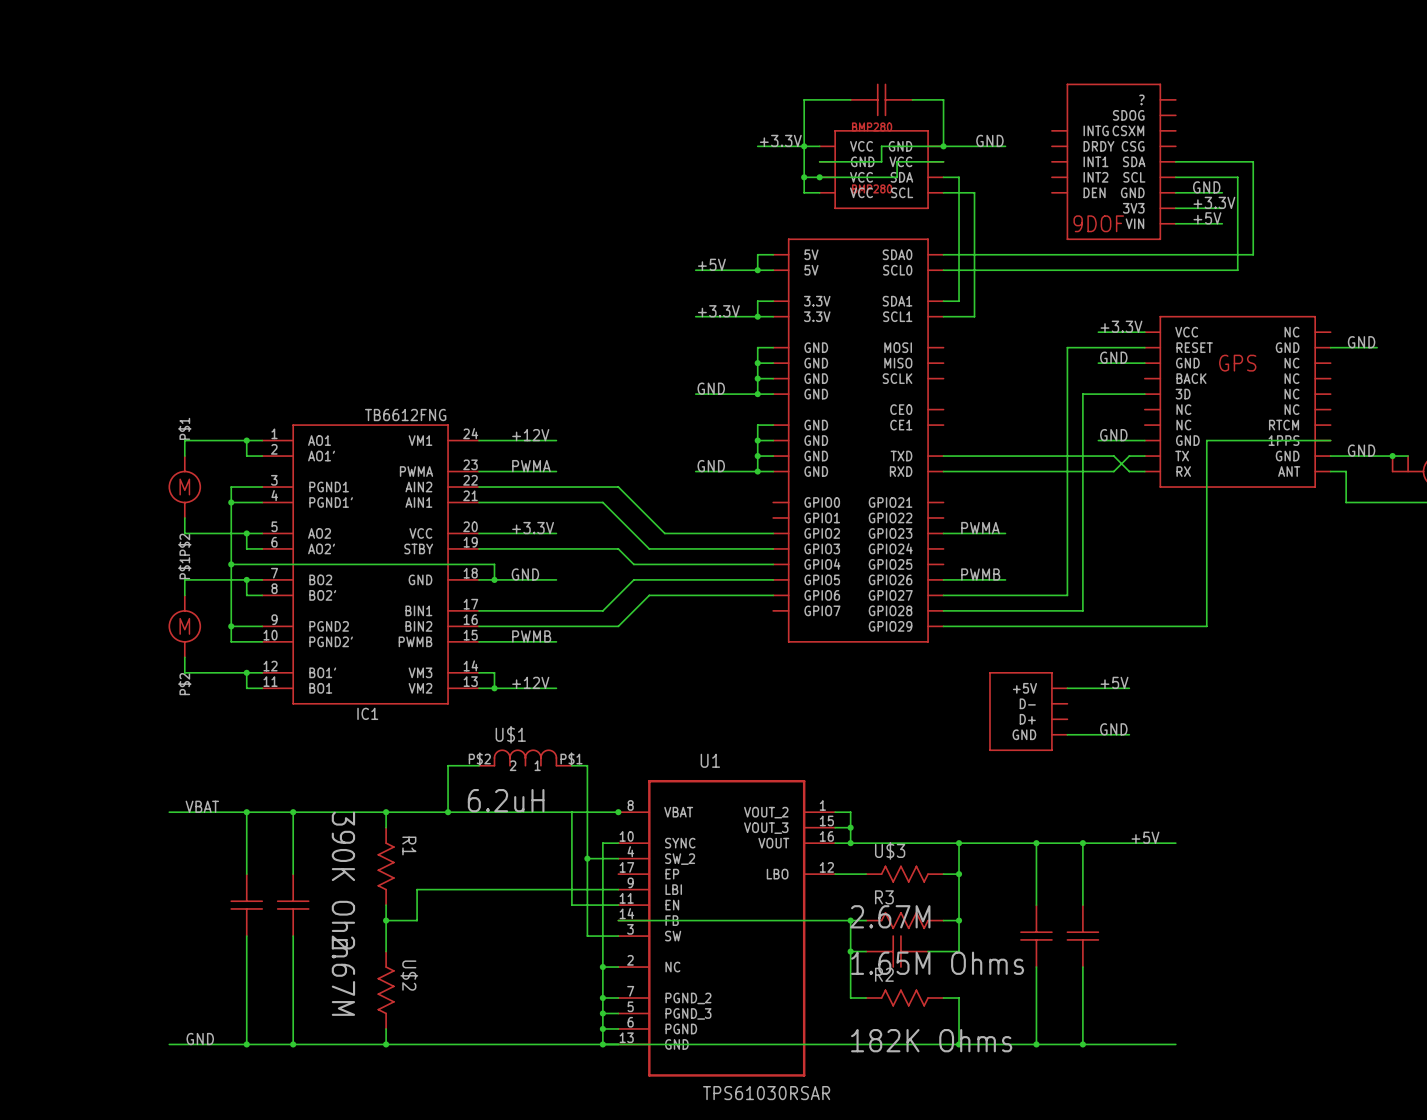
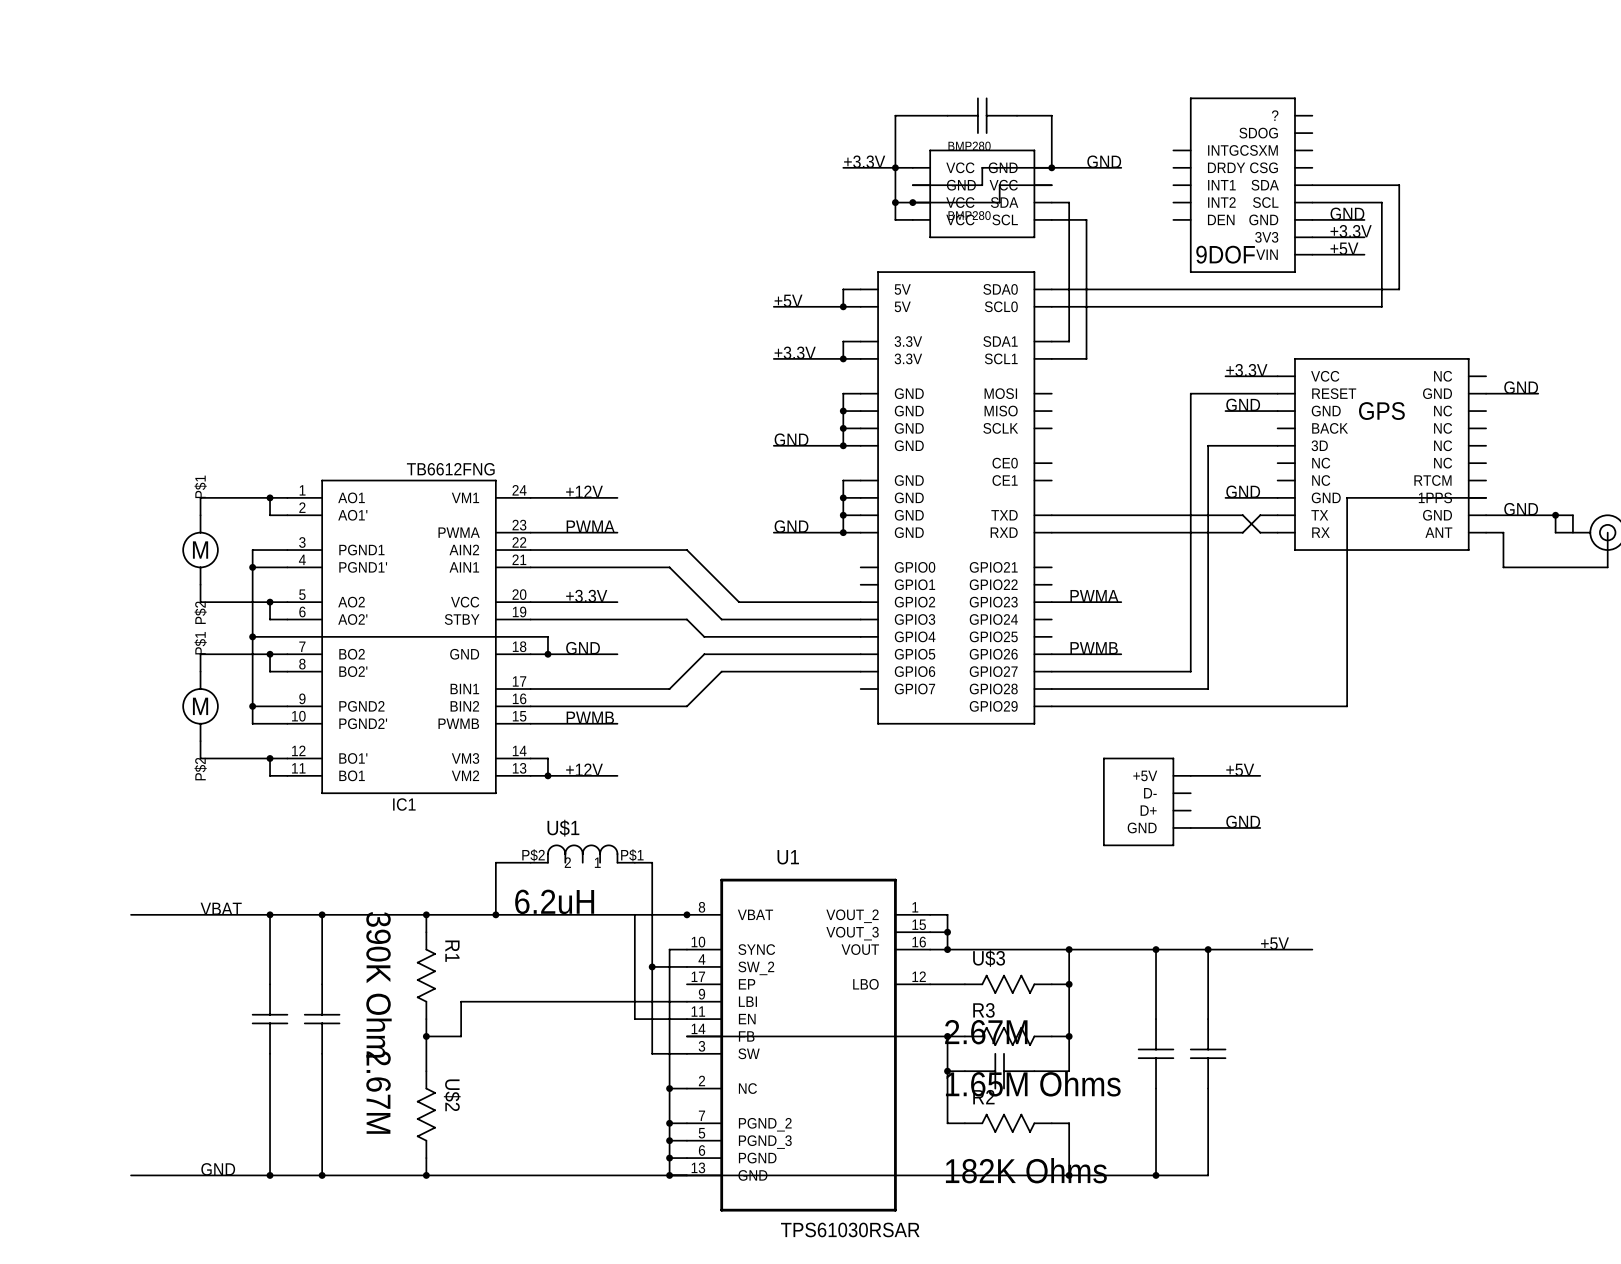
wire: none -> (131, 914) (183, 914)
wire: none -> (131, 1175) (183, 1175)
wire: (1082, 1044) (1175, 1044) -> none
junction: (1082, 1044) -> none

